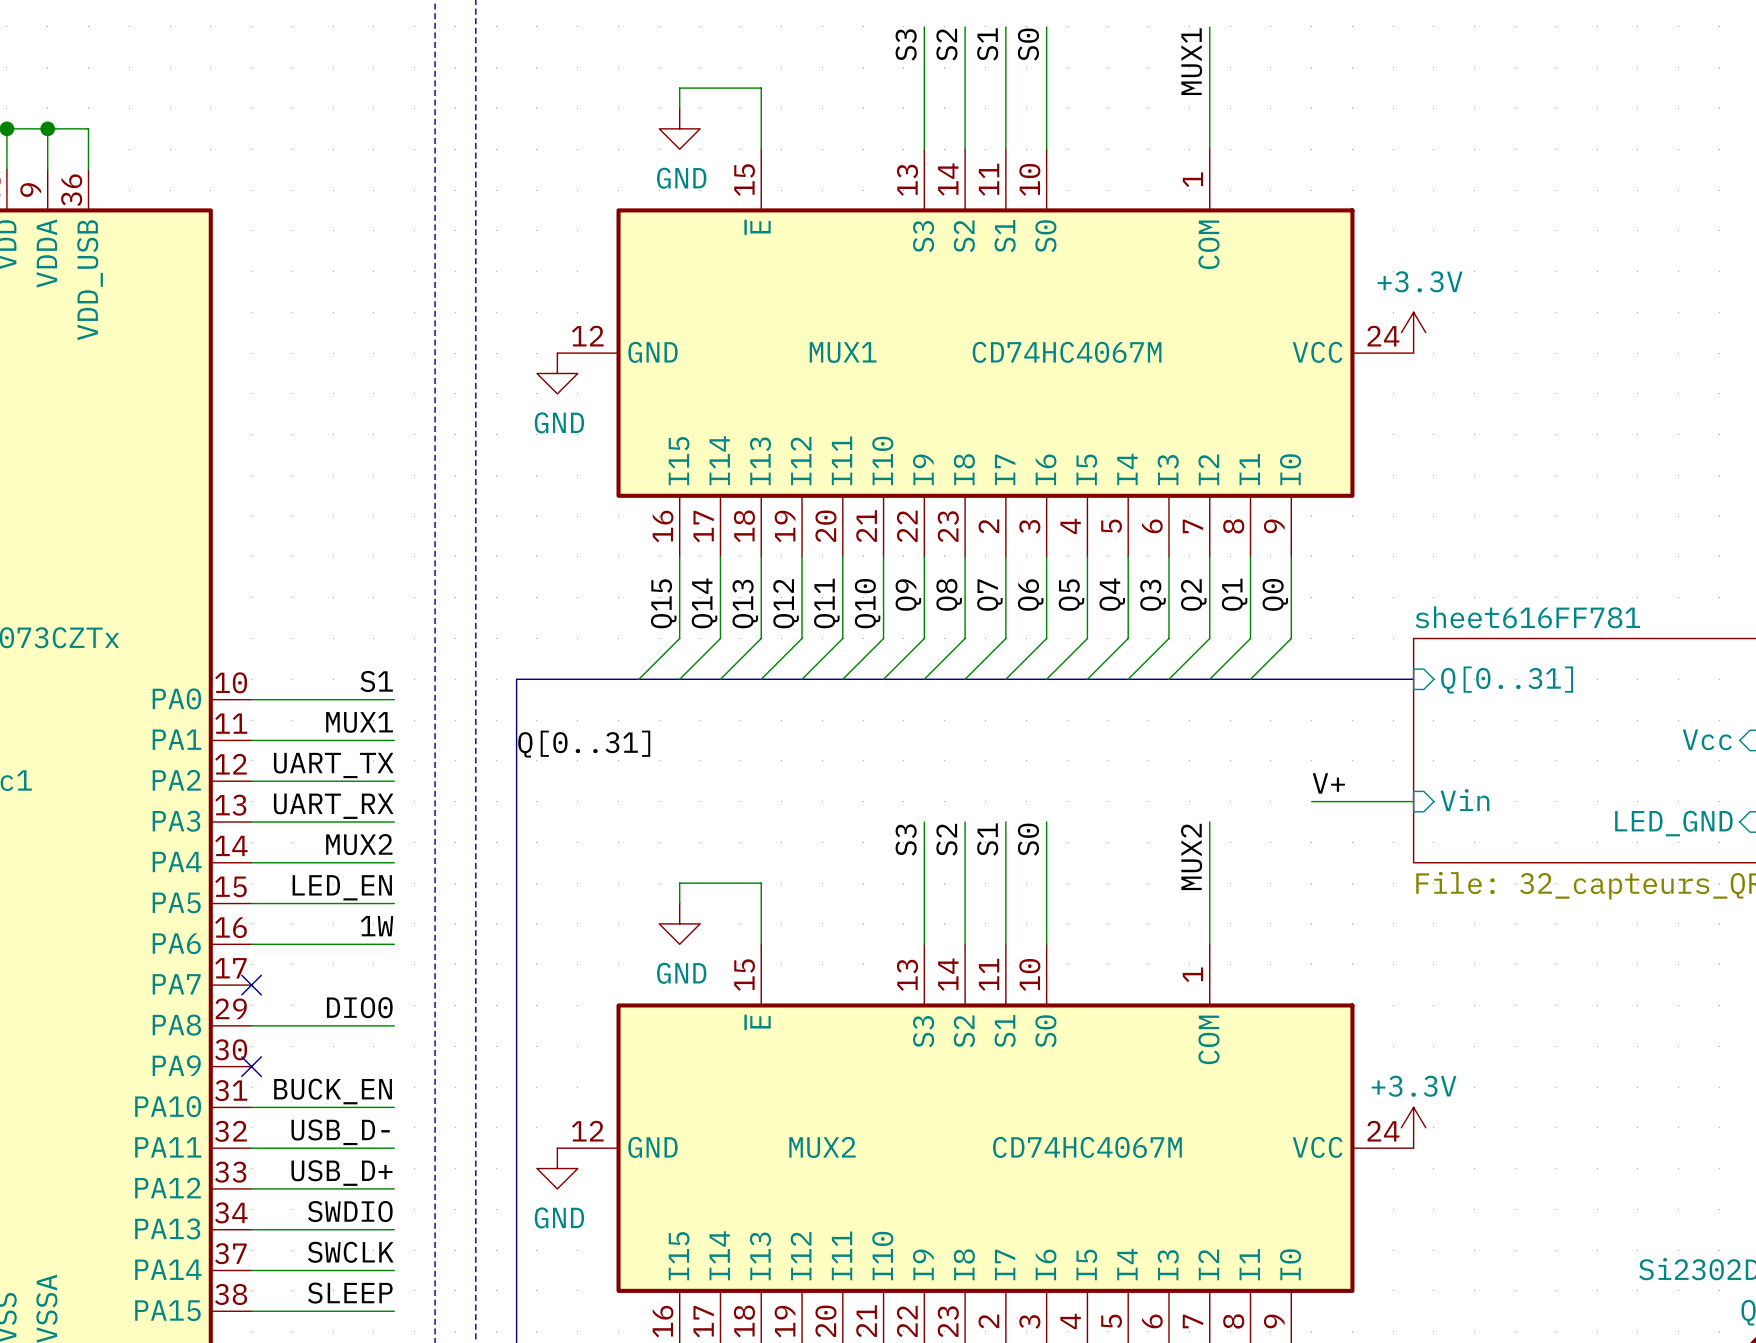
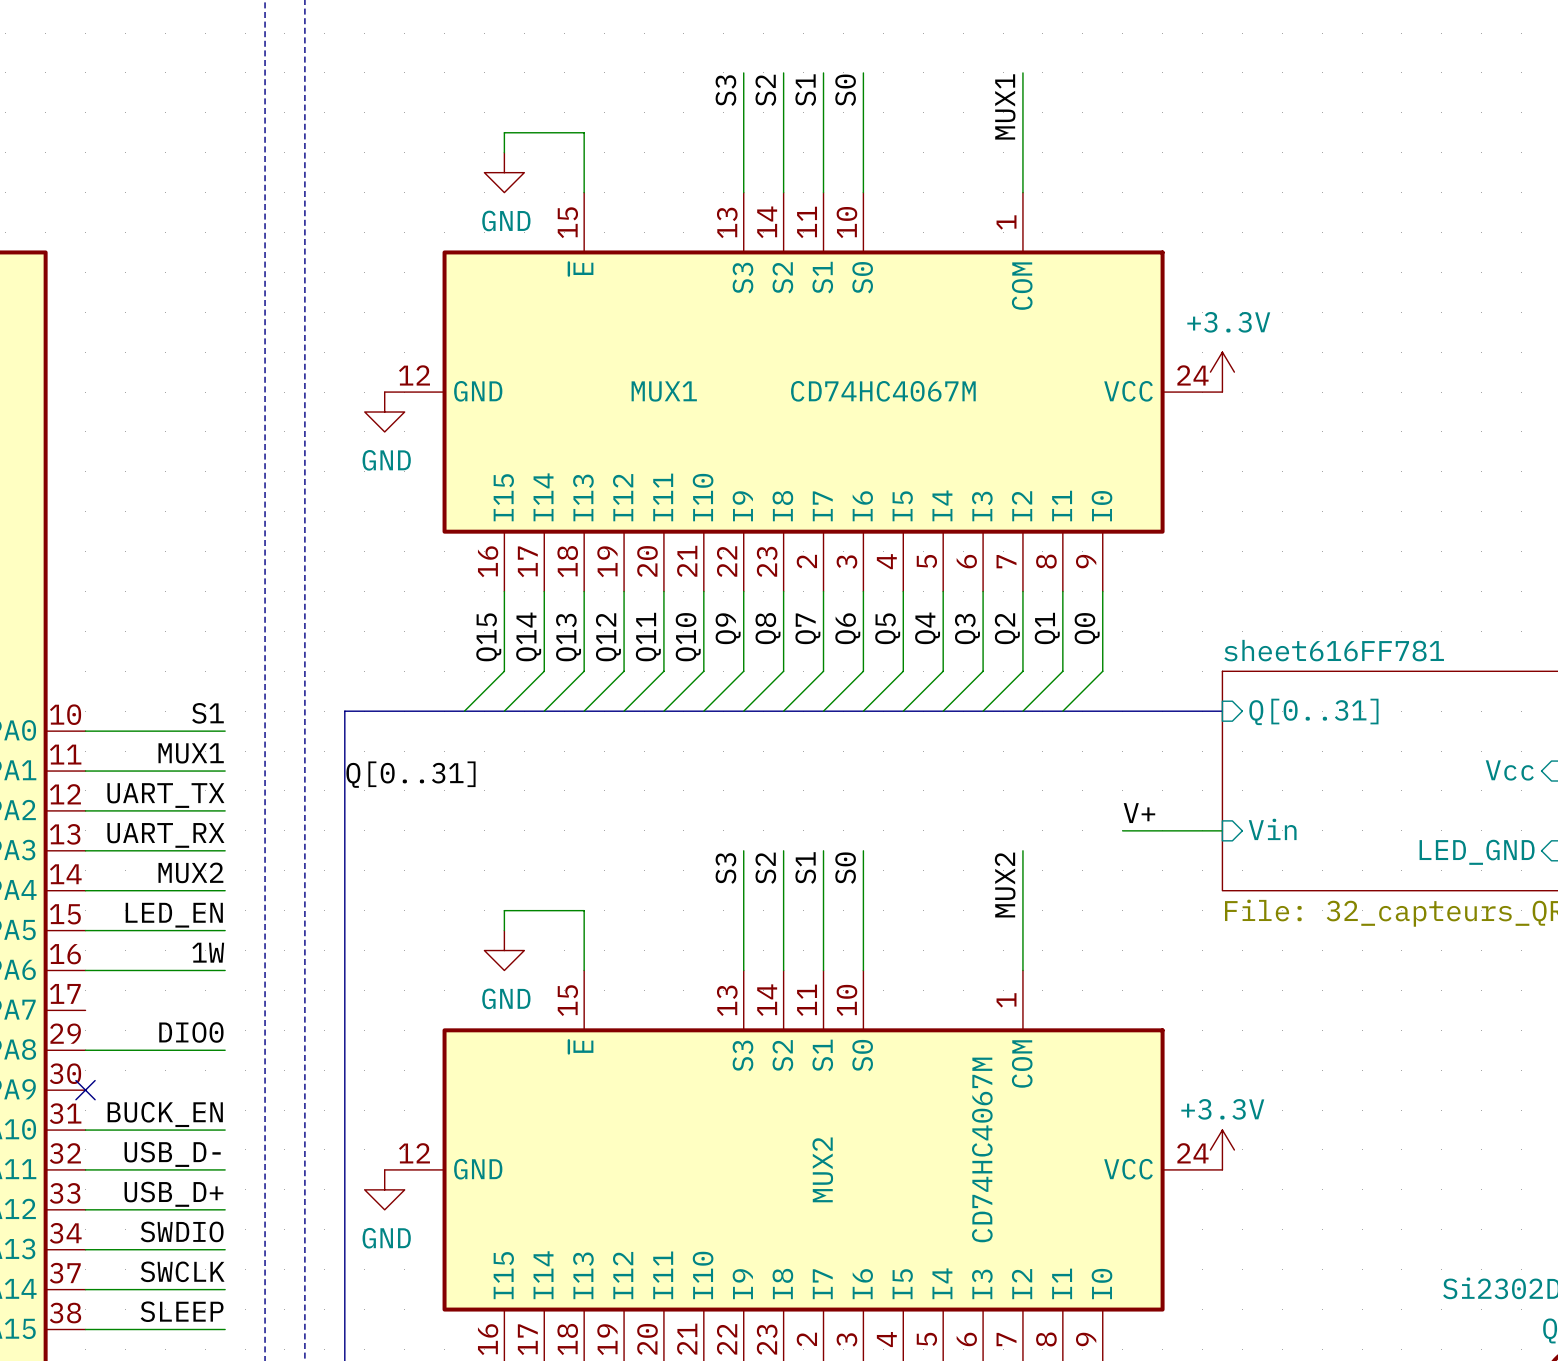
no-connect mark: (251, 985) -> none
MUX2 name rotation: 0° (822, 1147) -> 90° counterclockwise (822, 1169)
MUX2 name position: MUX2 (822, 1147) -> MUX2 (822, 1169)
MUX2 value rotation: 0° (1087, 1147) -> 90° counterclockwise (982, 1149)

